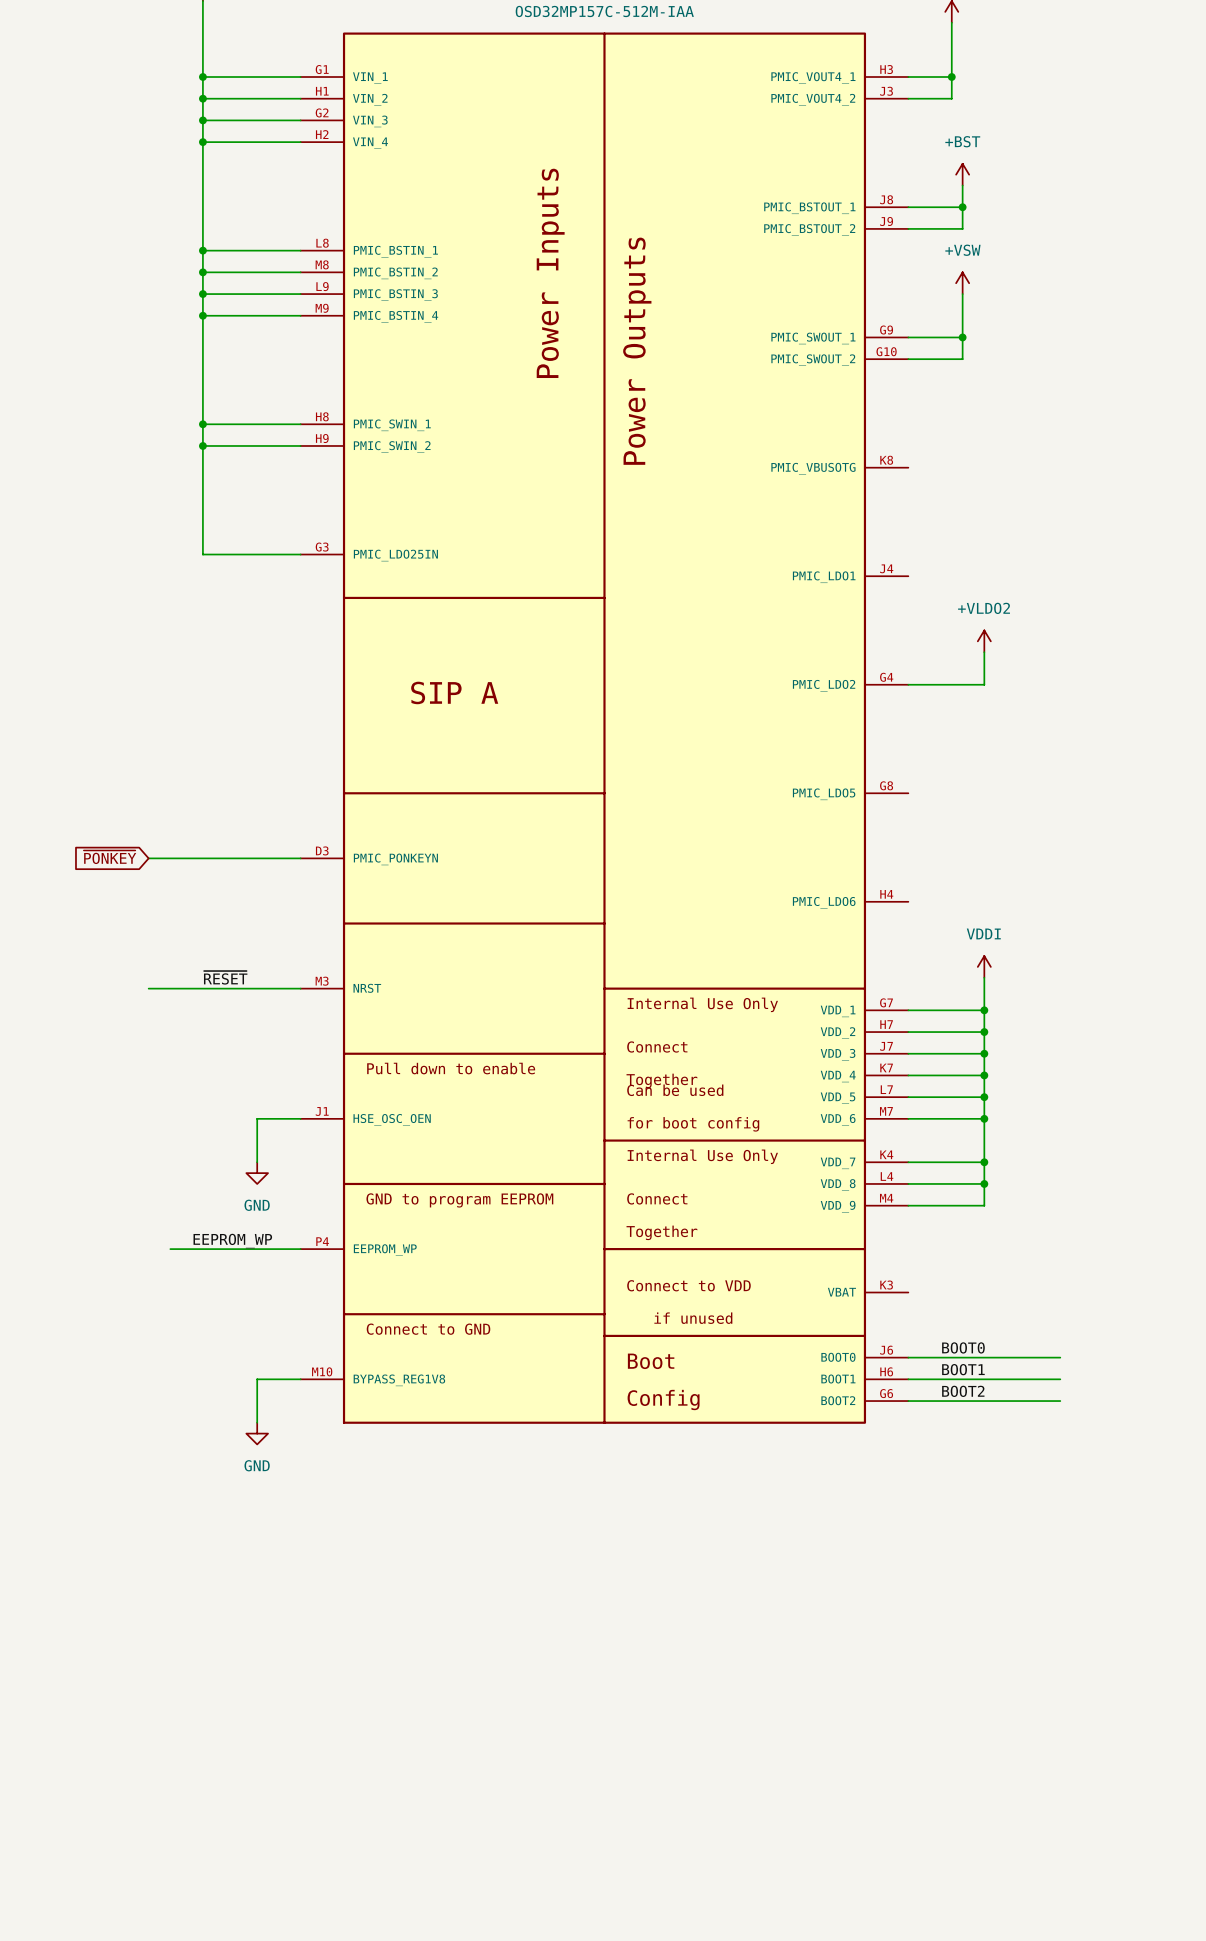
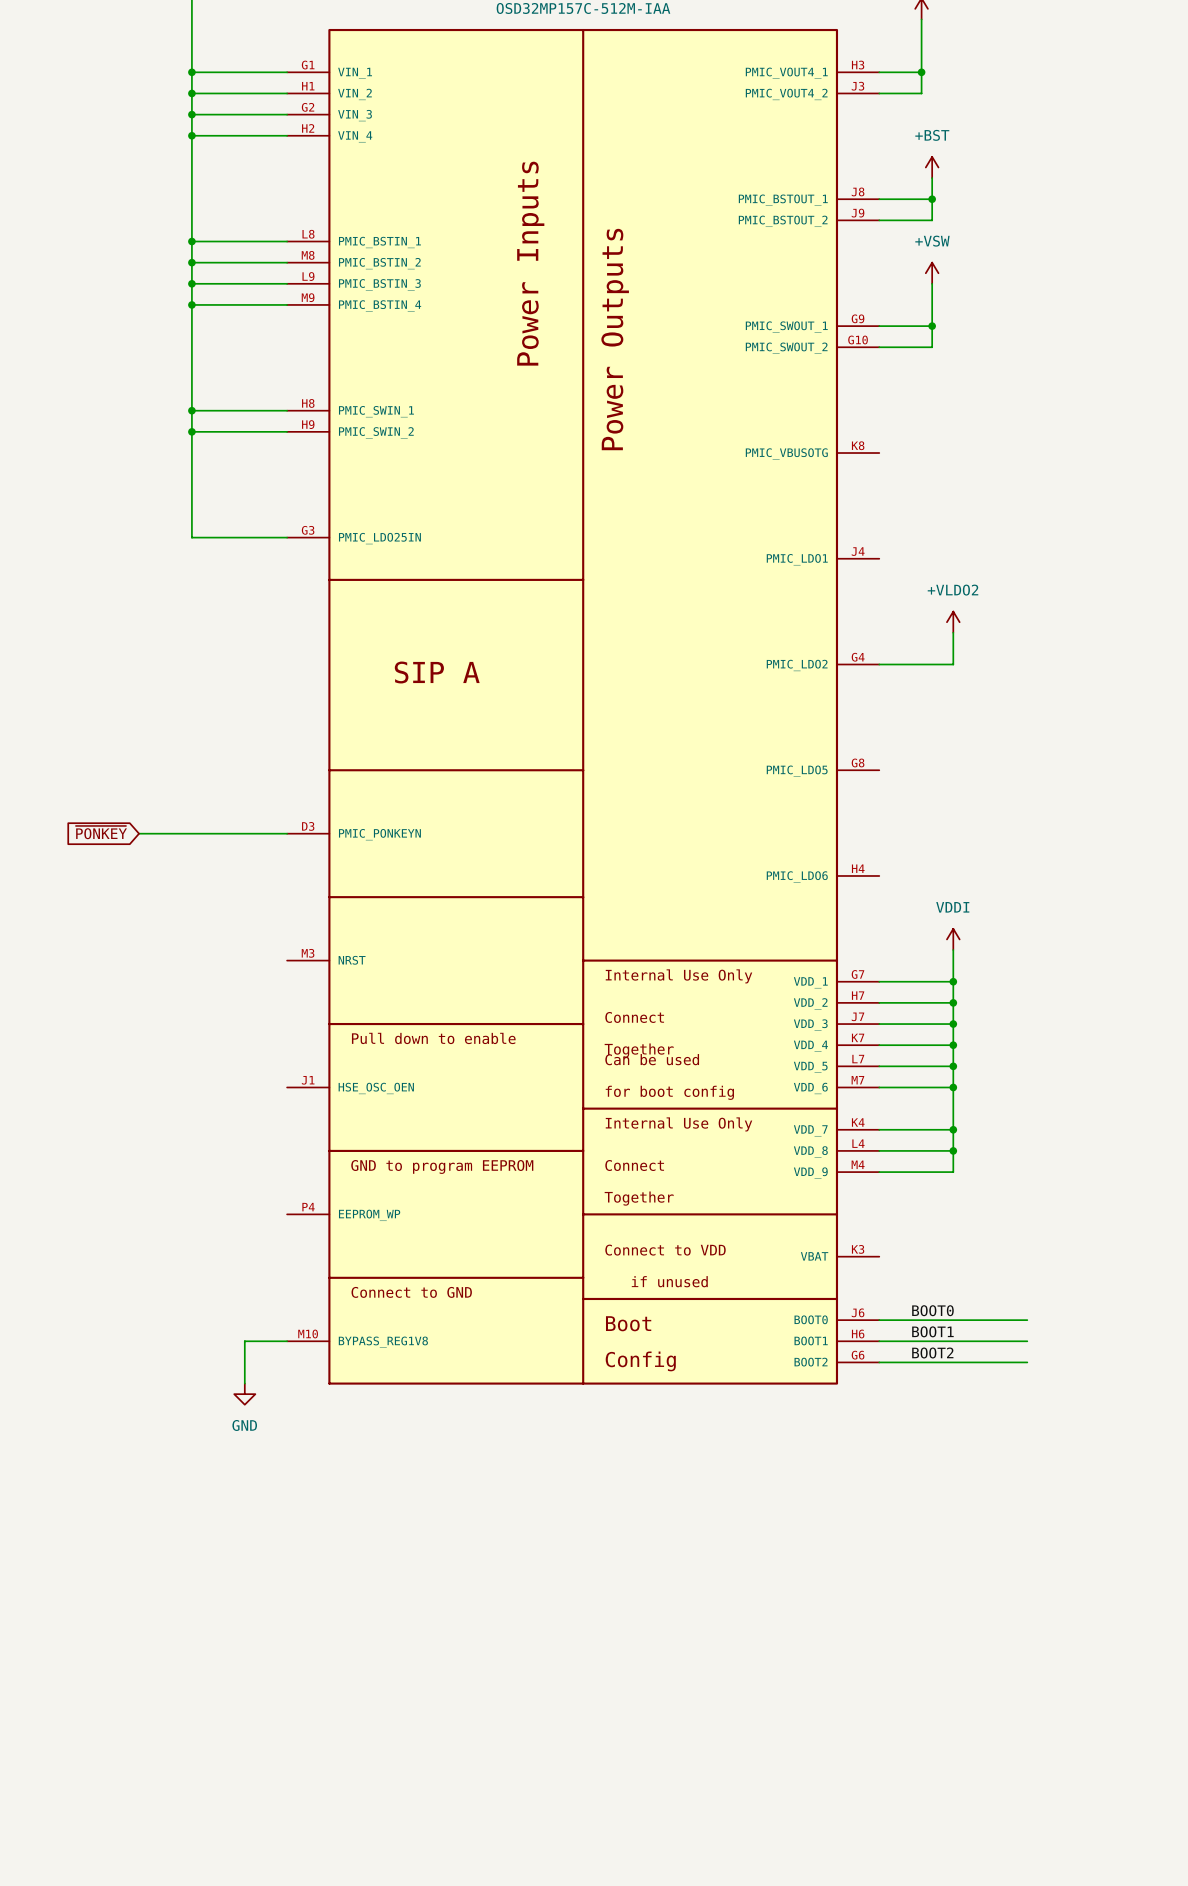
label: ~{RESET} (225, 977) -> none
wire: (148, 988) (300, 988) -> none
wire: (300, 1118) (257, 1118) (257, 1162) -> none
power symbol: GND (257, 1173) -> none
label: EEPROM_WP (232, 1241) -> none
wire: (170, 1249) (300, 1249) -> none

